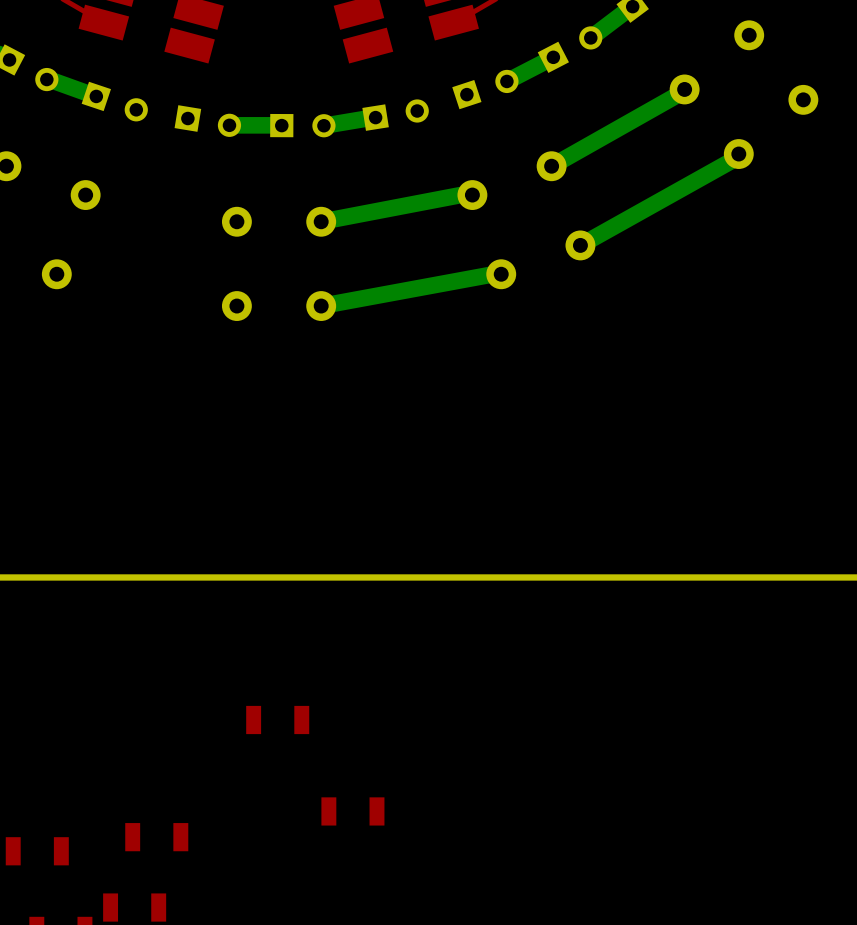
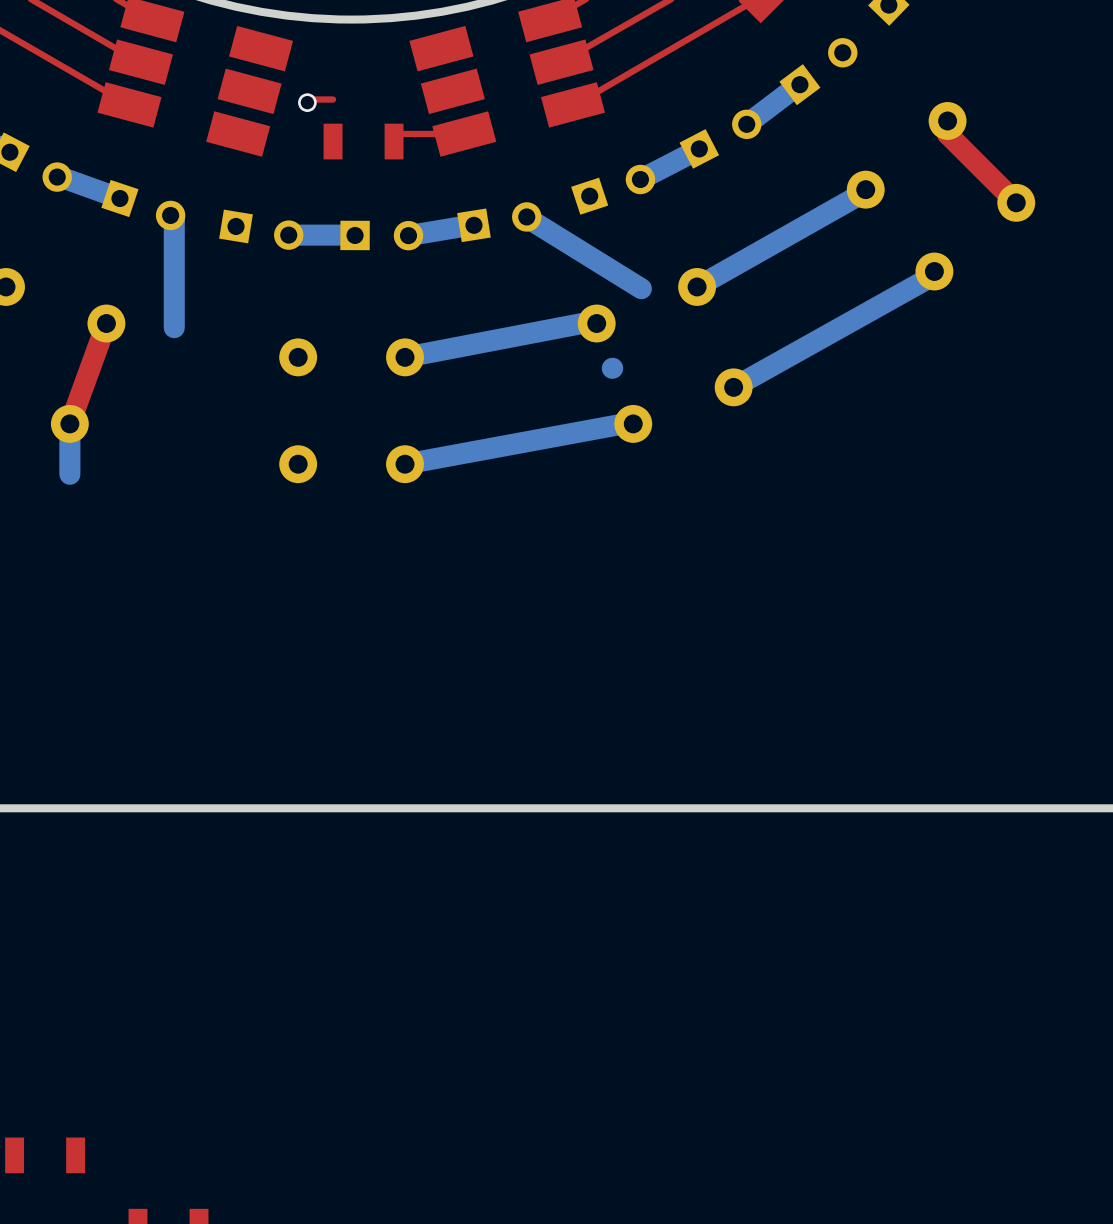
top track: none -> (333, 99) (310, 99) (307, 102)
via: none -> (307, 102)
top track: none -> (947, 120) (947, 134) (1016, 202)
top track: none -> (464, 134) (401, 134) (394, 141)
part: none -> (363, 141)
bottom track: none -> (170, 215) (174, 219) (174, 327)
bottom track: none -> (526, 216) (641, 288)
top track: none -> (106, 323) (69, 423)
bottom track: none -> (612, 368) (612, 368)
bottom track: none -> (69, 423) (69, 474)
part: (277, 719) -> none
part: (352, 811) -> none
part: (156, 837) -> none

